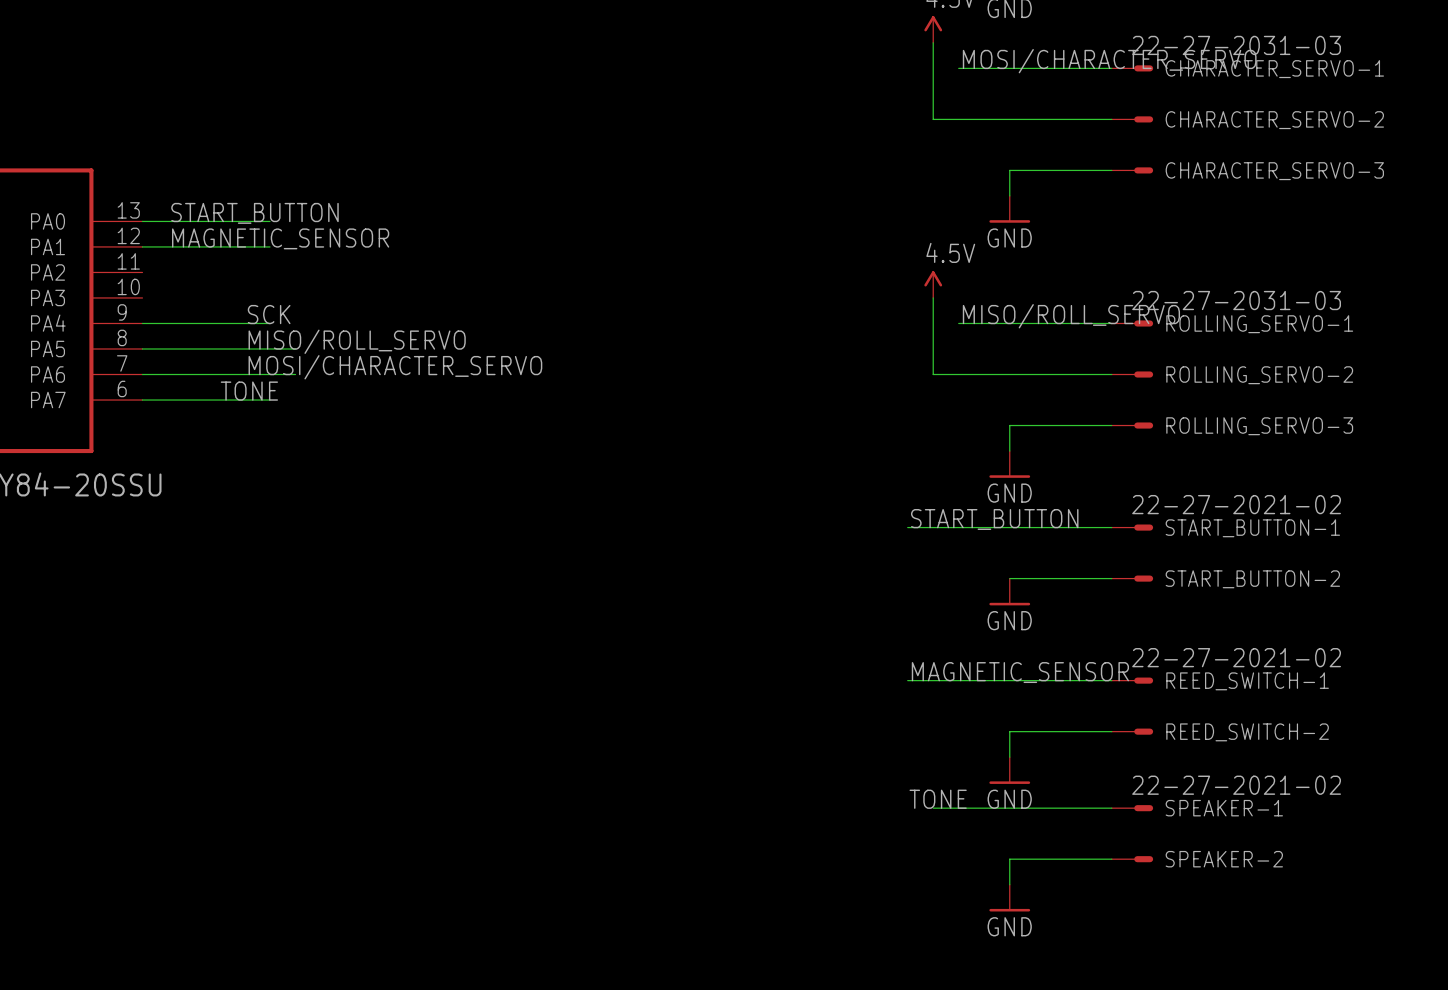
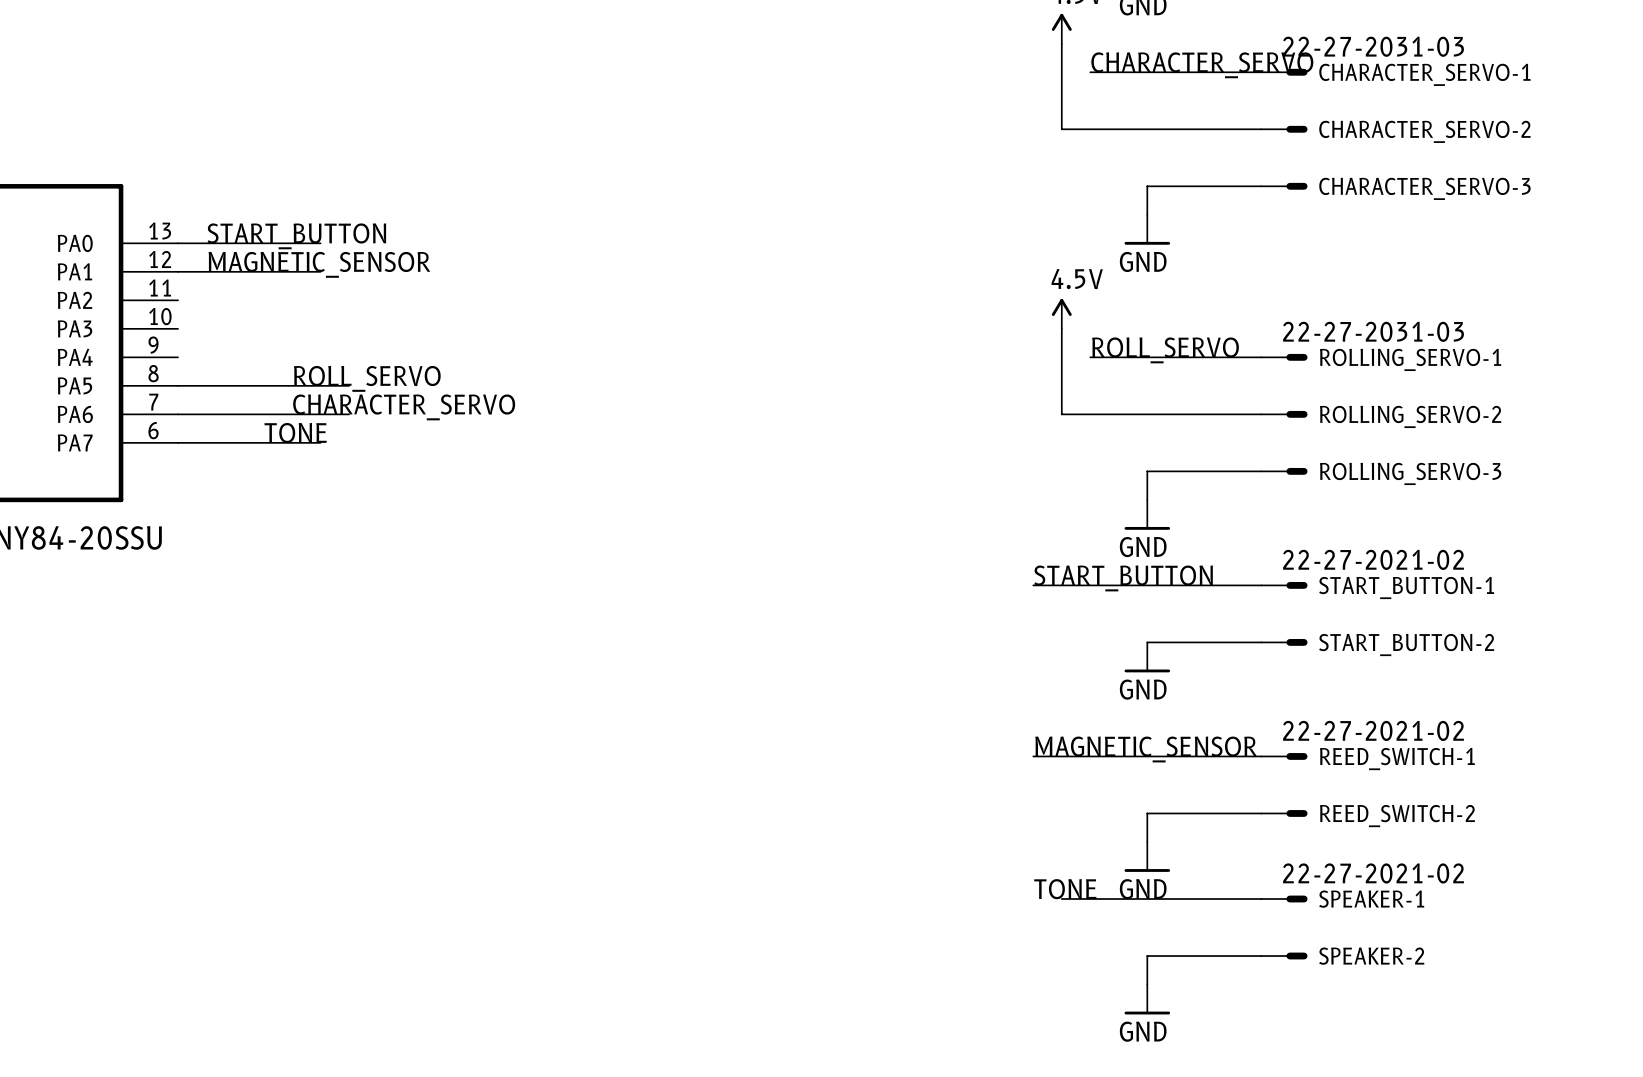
label: MOSI/CHARACTER_SERVO (1109, 61) -> CHARACTER_SERVO (1202, 65)
label: SCK (269, 314) -> none
label: MISO/ROLL_SERVO (1071, 316) -> ROLL_SERVO (1165, 350)
wire: (142, 323) (269, 323) -> none
label: MISO/ROLL_SERVO (357, 341) -> ROLL_SERVO (367, 378)
label: MOSI/CHARACTER_SERVO (395, 367) -> CHARACTER_SERVO (404, 407)

